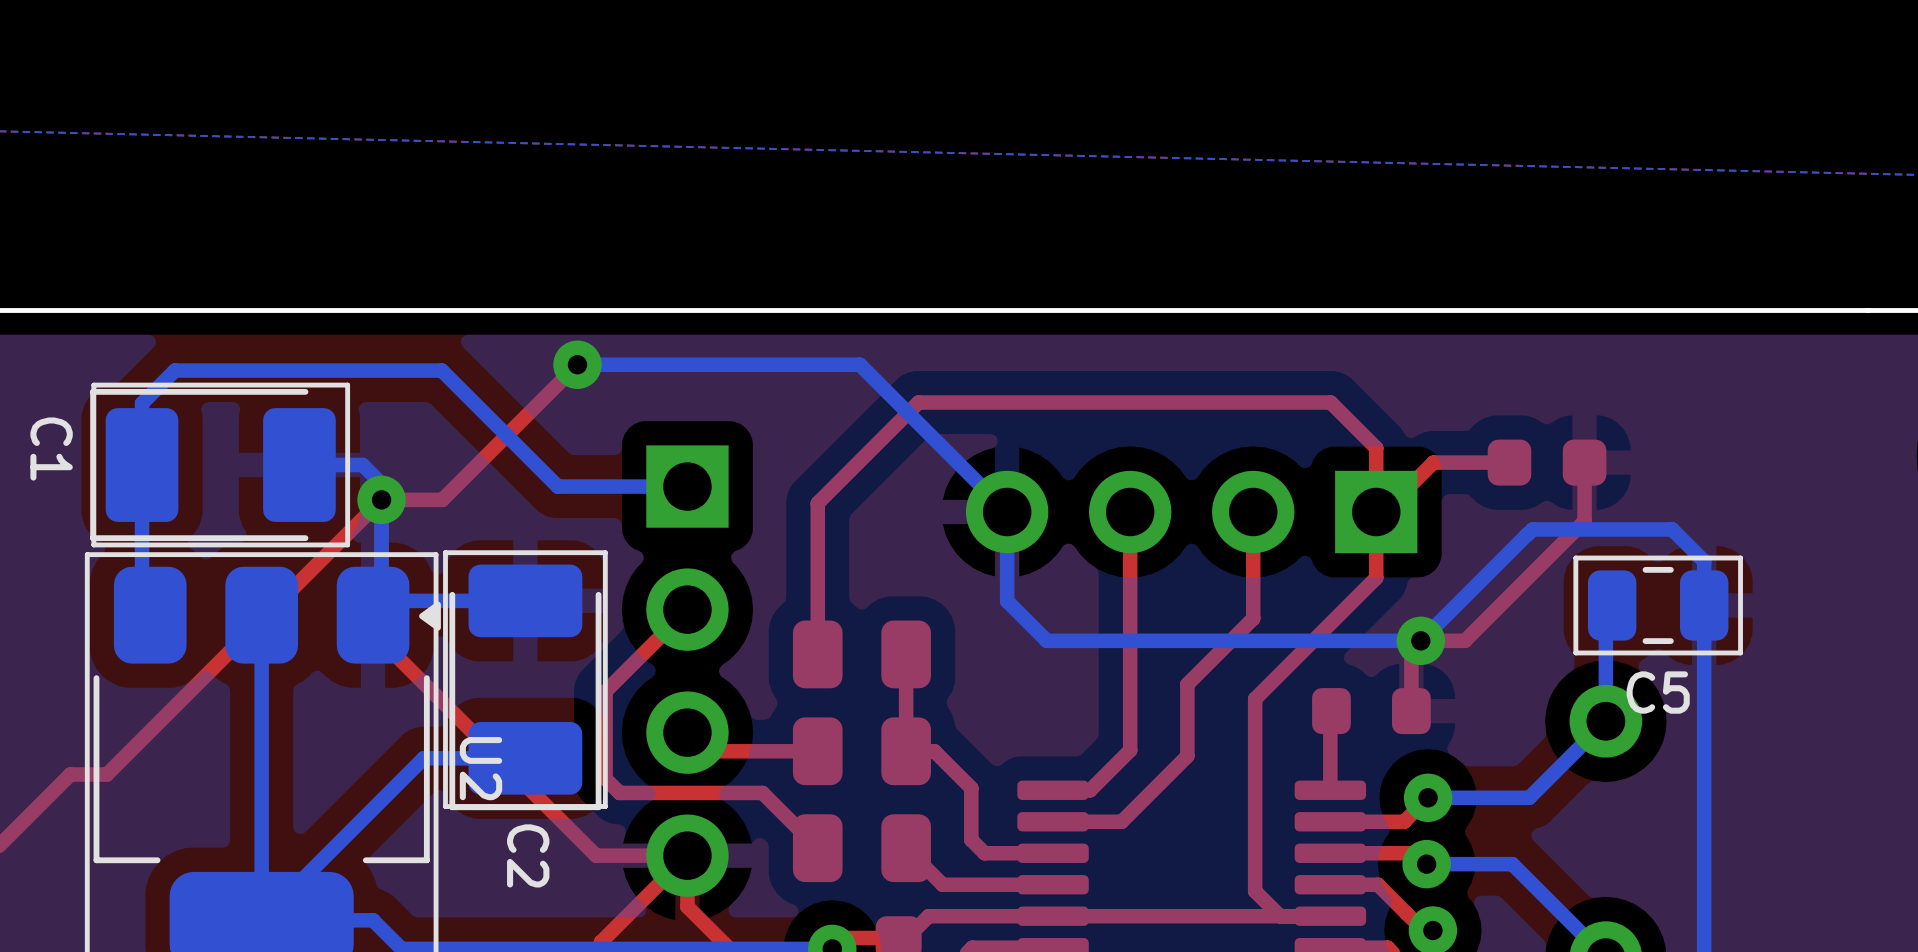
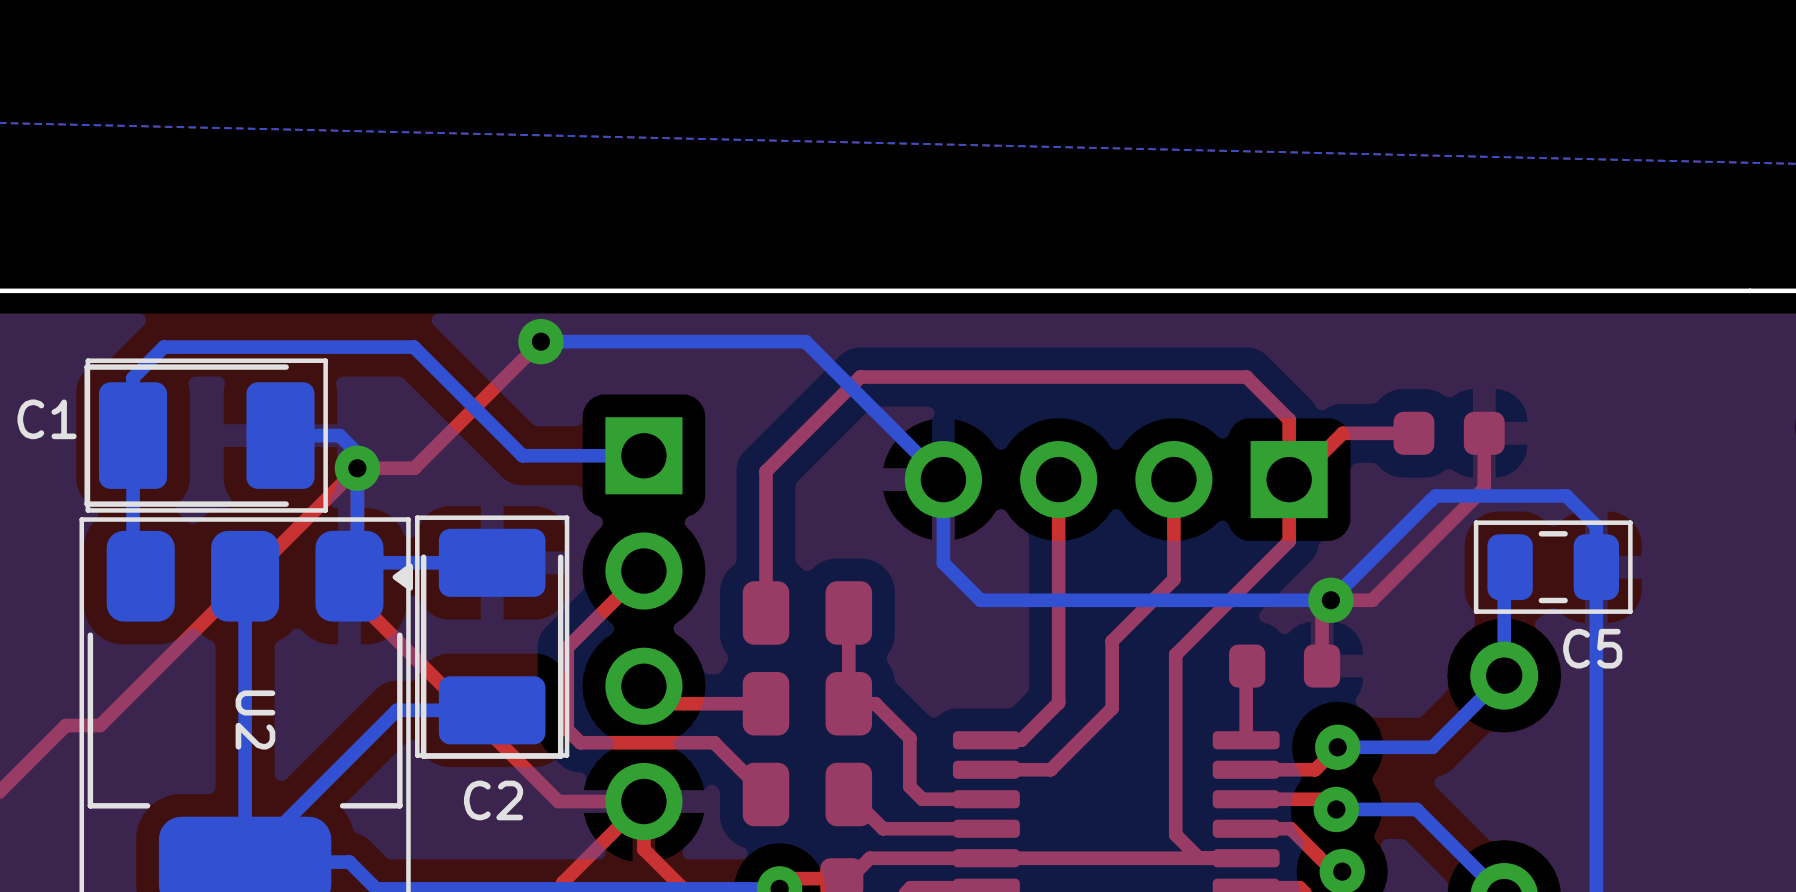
C1 name rotation: 0° (51, 449) -> 90° counterclockwise (47, 419)
C5 name position: C5 (1658, 692) -> C5 (1592, 648)
U2 name position: U2 (481, 768) -> U2 (255, 719)
C2 name rotation: 0° (528, 855) -> 90° counterclockwise (493, 800)

